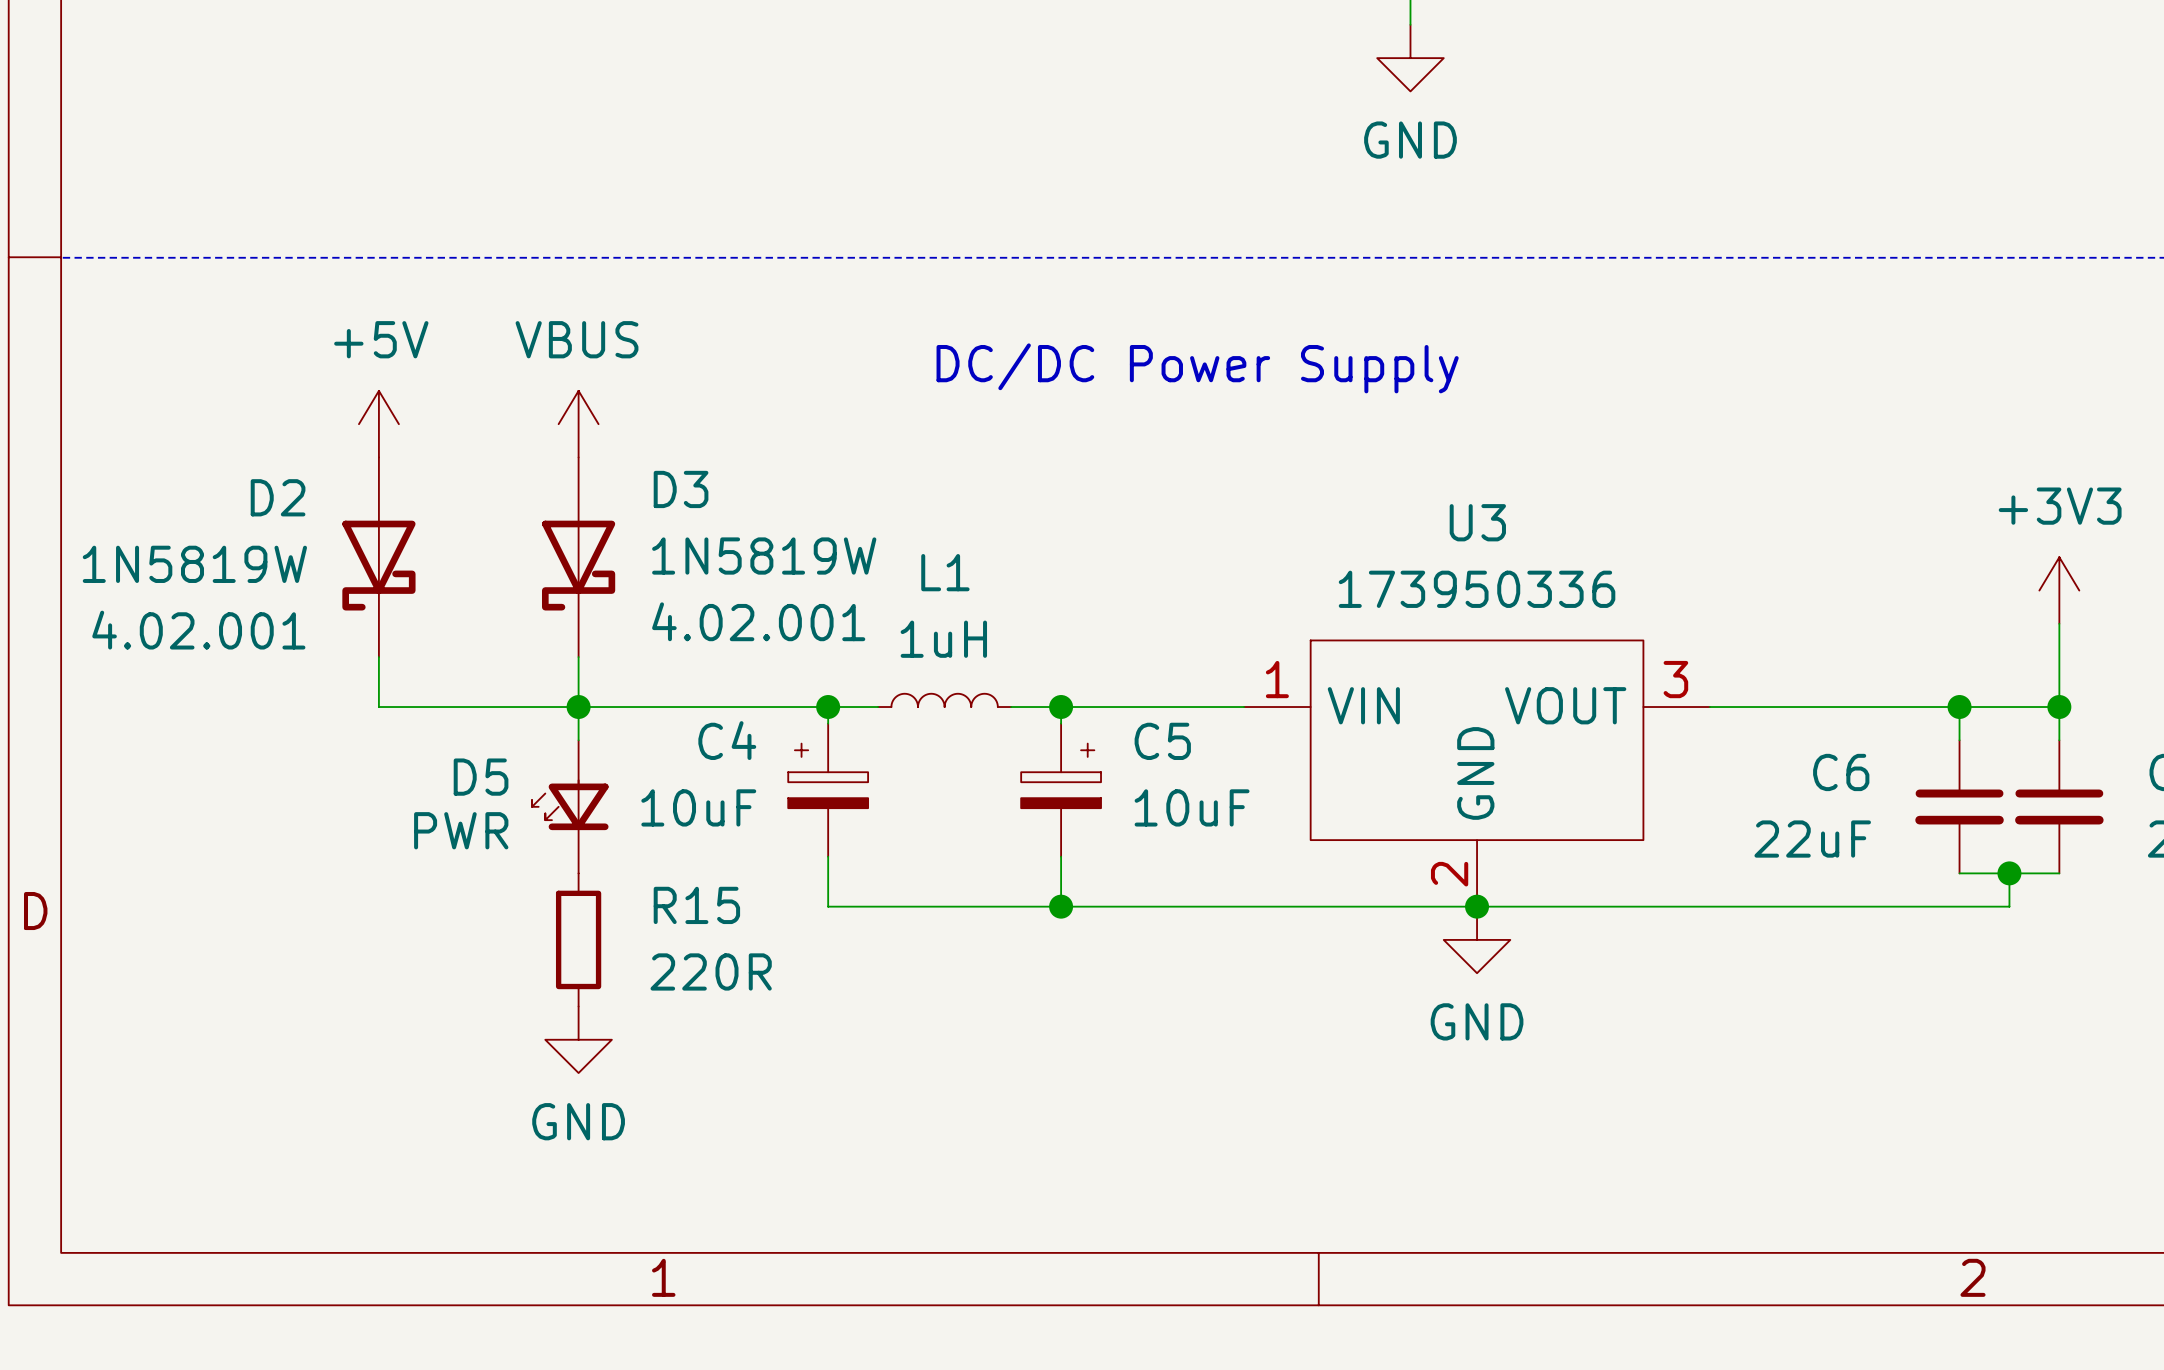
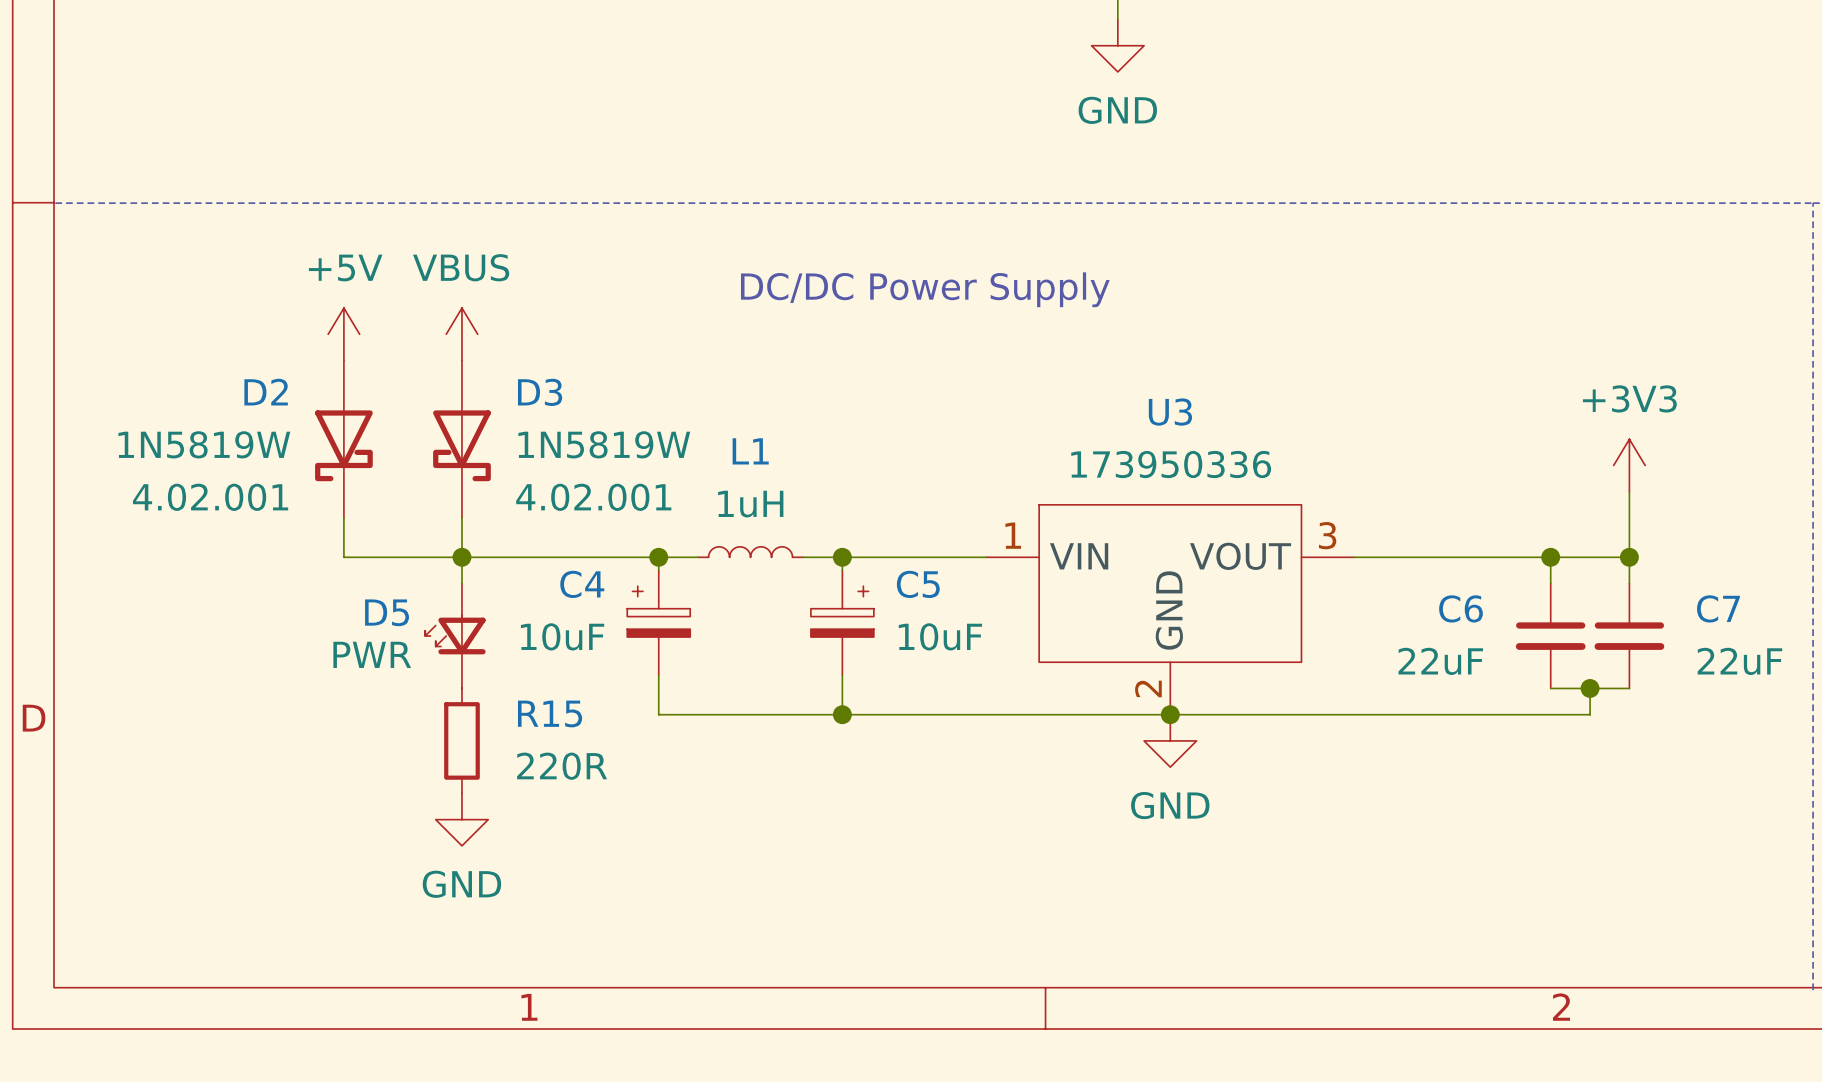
power symbol position: +5V (378, 424) -> +5V (343, 334)
D2 position: (378, 557) -> (343, 439)
D3 flip: as is (578, 565) -> left-right (461, 445)
wire: (378, 657) (378, 707) (428, 707) -> (343, 517) (343, 557)

